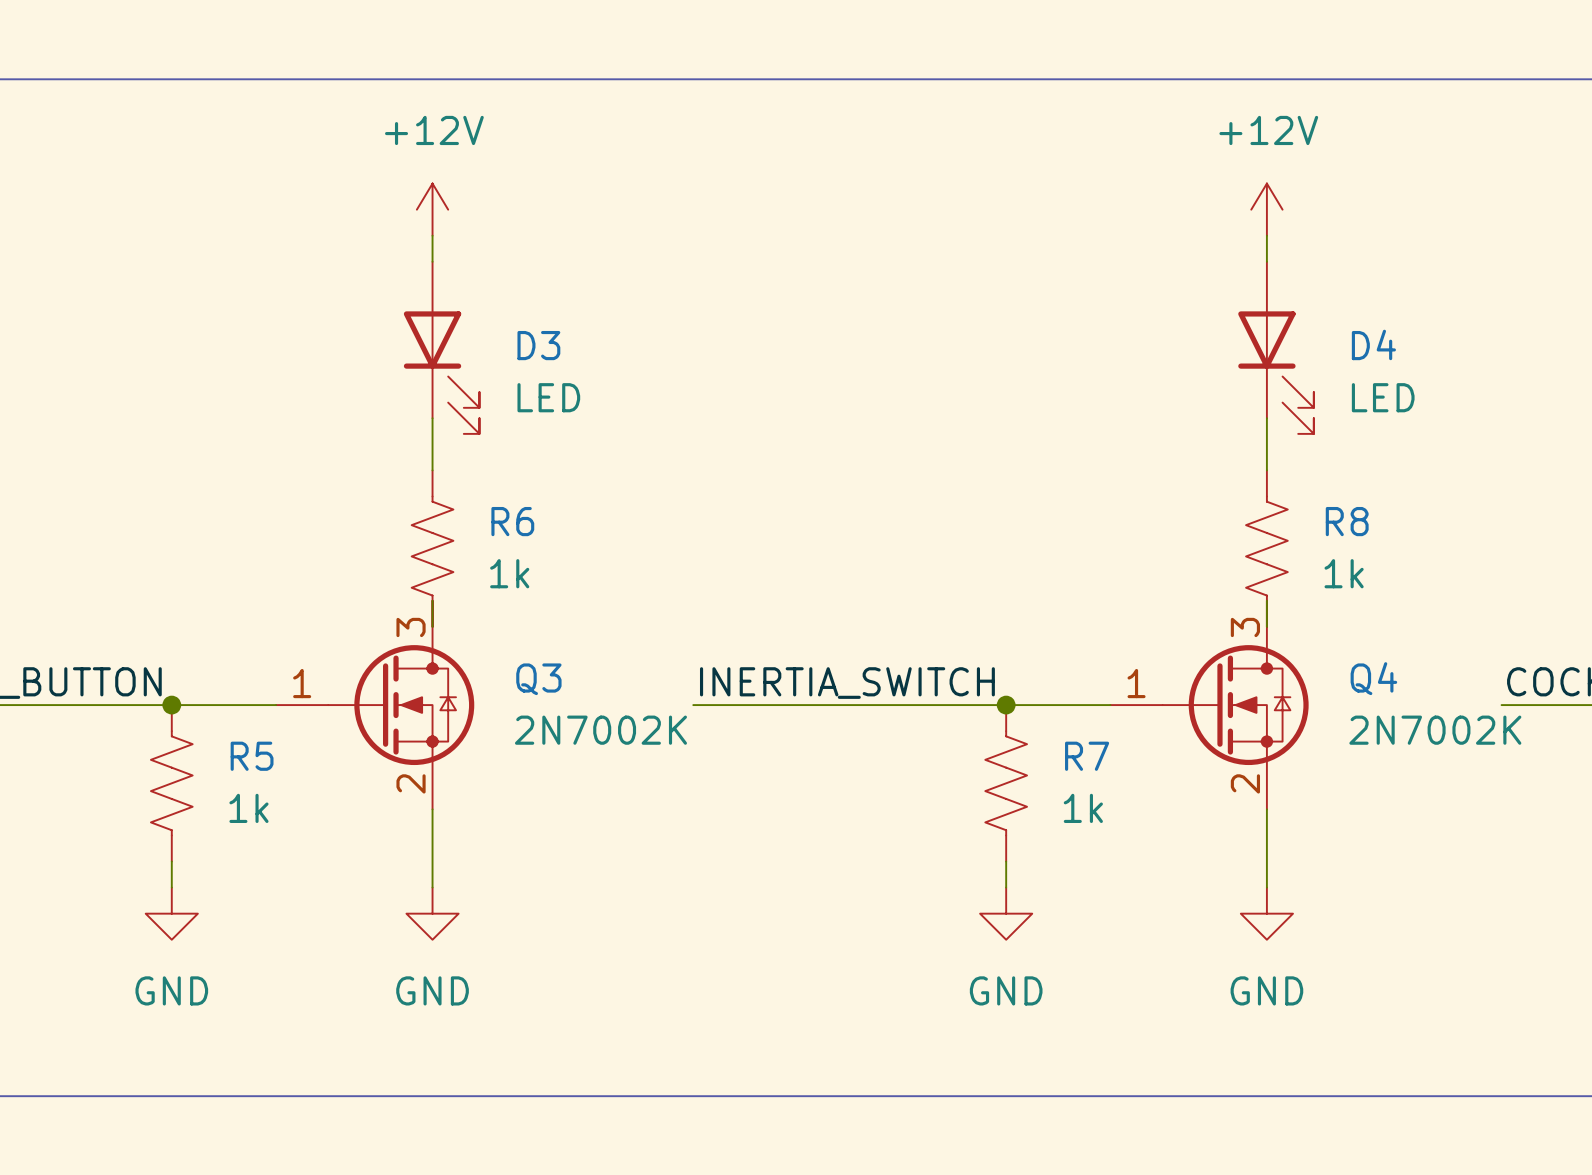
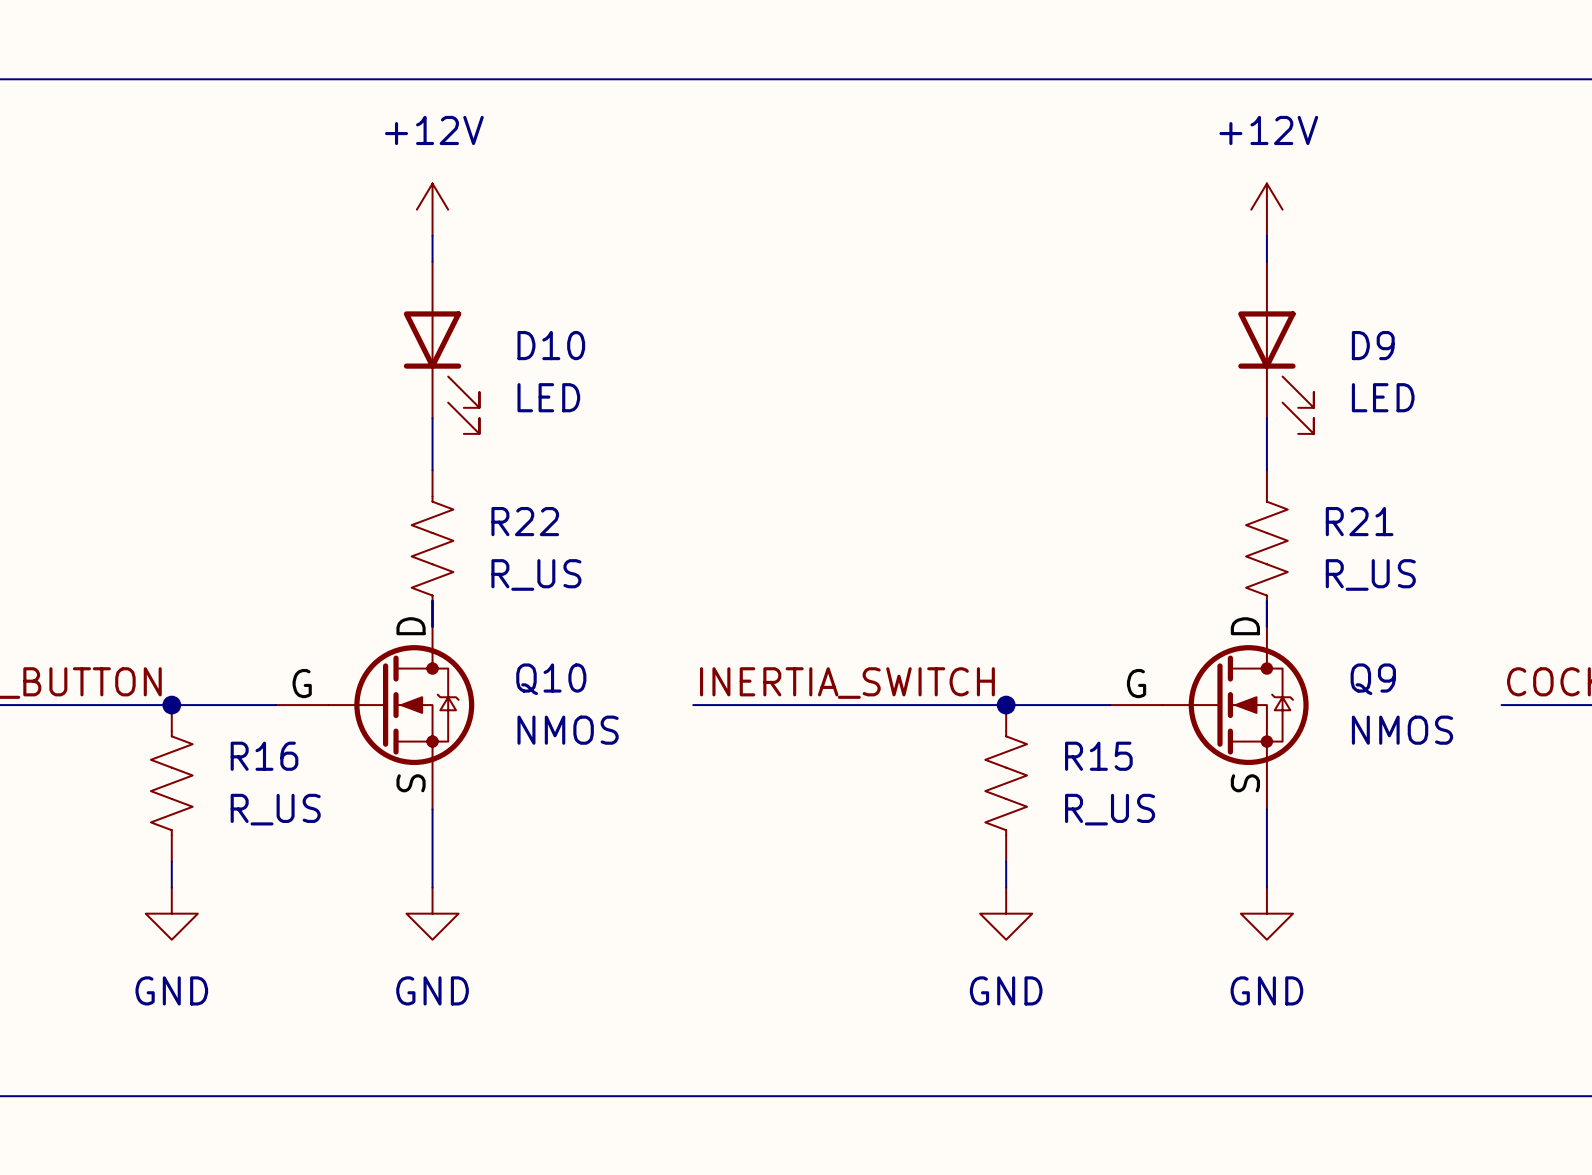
D4 name: D4 (1373, 344) -> D9 (1373, 345)
D3 name: D3 (538, 345) -> D10 (551, 345)
R6 name: R6 (512, 521) -> R22 (525, 521)
R8 name: R8 (1347, 521) -> R21 (1359, 521)
R6 value: 1k (509, 573) -> R_US (536, 574)
R8 value: 1k (1344, 573) -> R_US (1370, 574)
Q3: 2N7002K (375, 705) -> none
Q10: none -> NMOS (375, 705)
Q4: 2N7002K (1209, 705) -> none
Q9: none -> NMOS (1209, 705)
R5 name: R5 (252, 756) -> R16 (264, 756)
R7 name: R7 (1087, 756) -> R15 (1098, 756)
R5 value: 1k (248, 808) -> R_US (275, 809)
R7 value: 1k (1083, 808) -> R_US (1110, 809)

